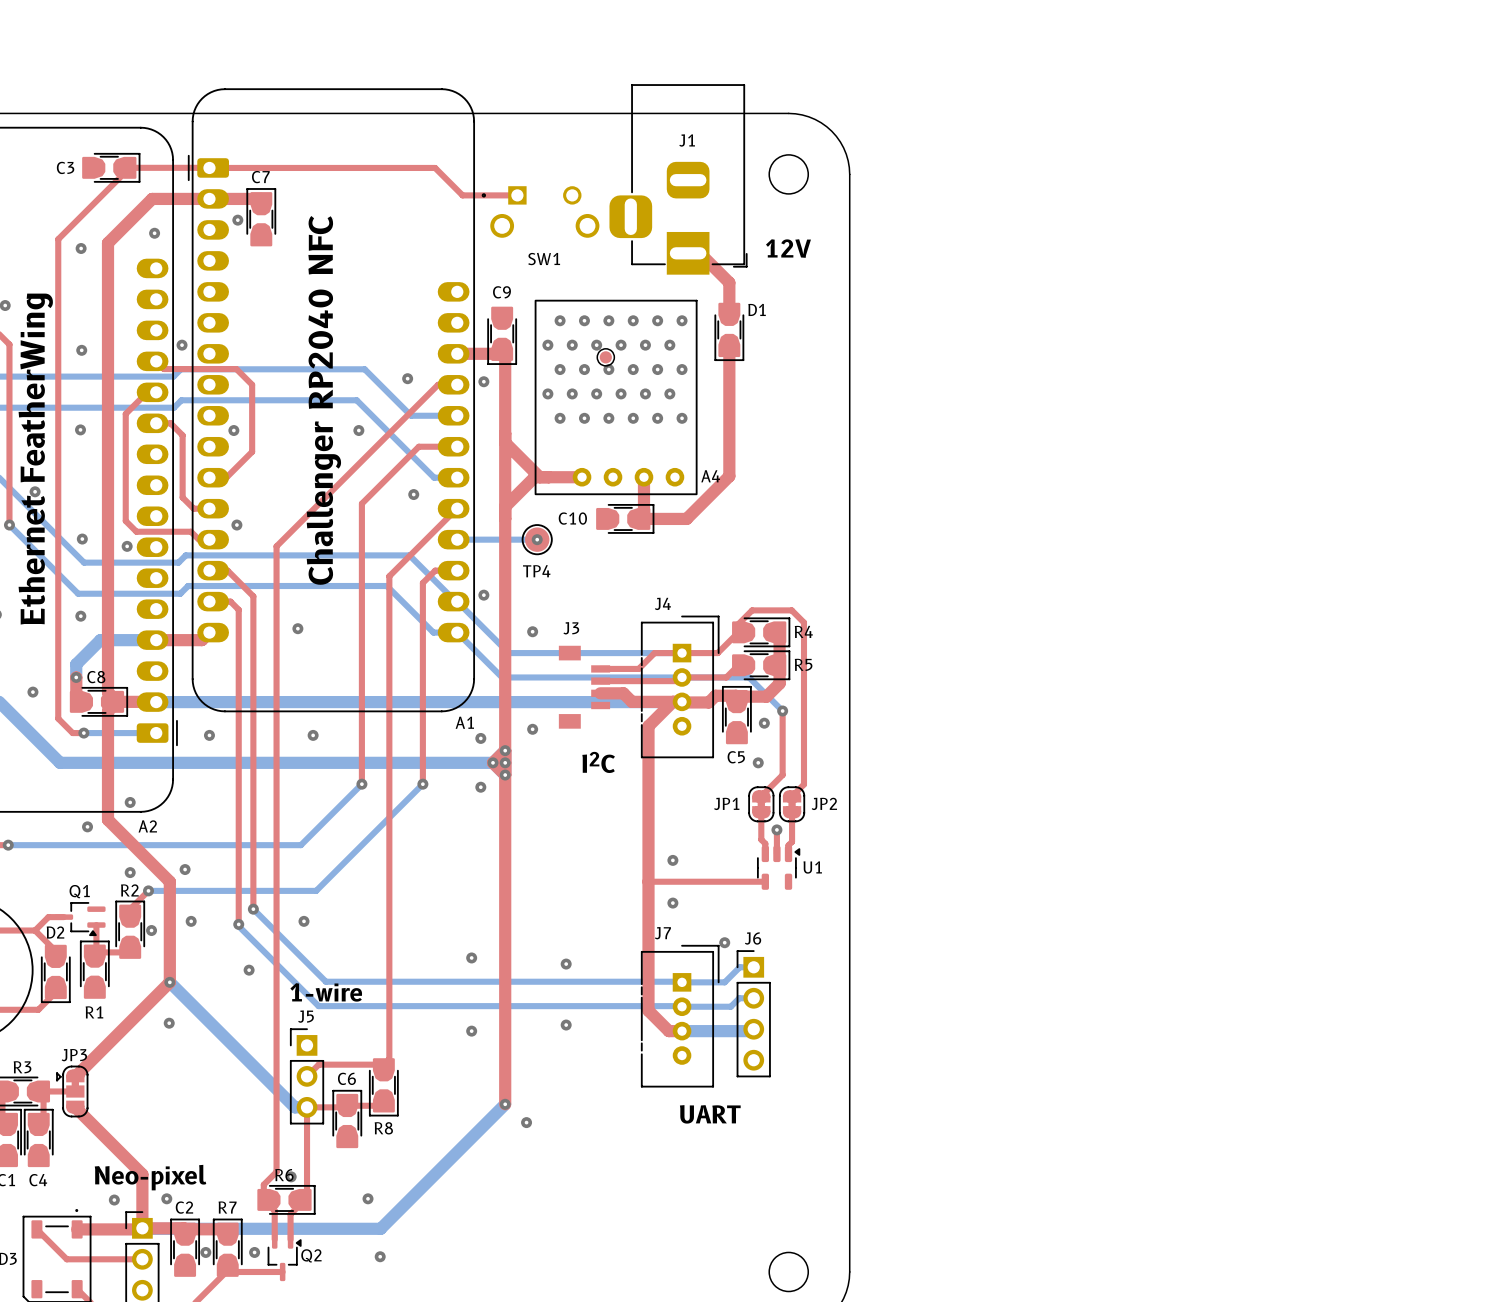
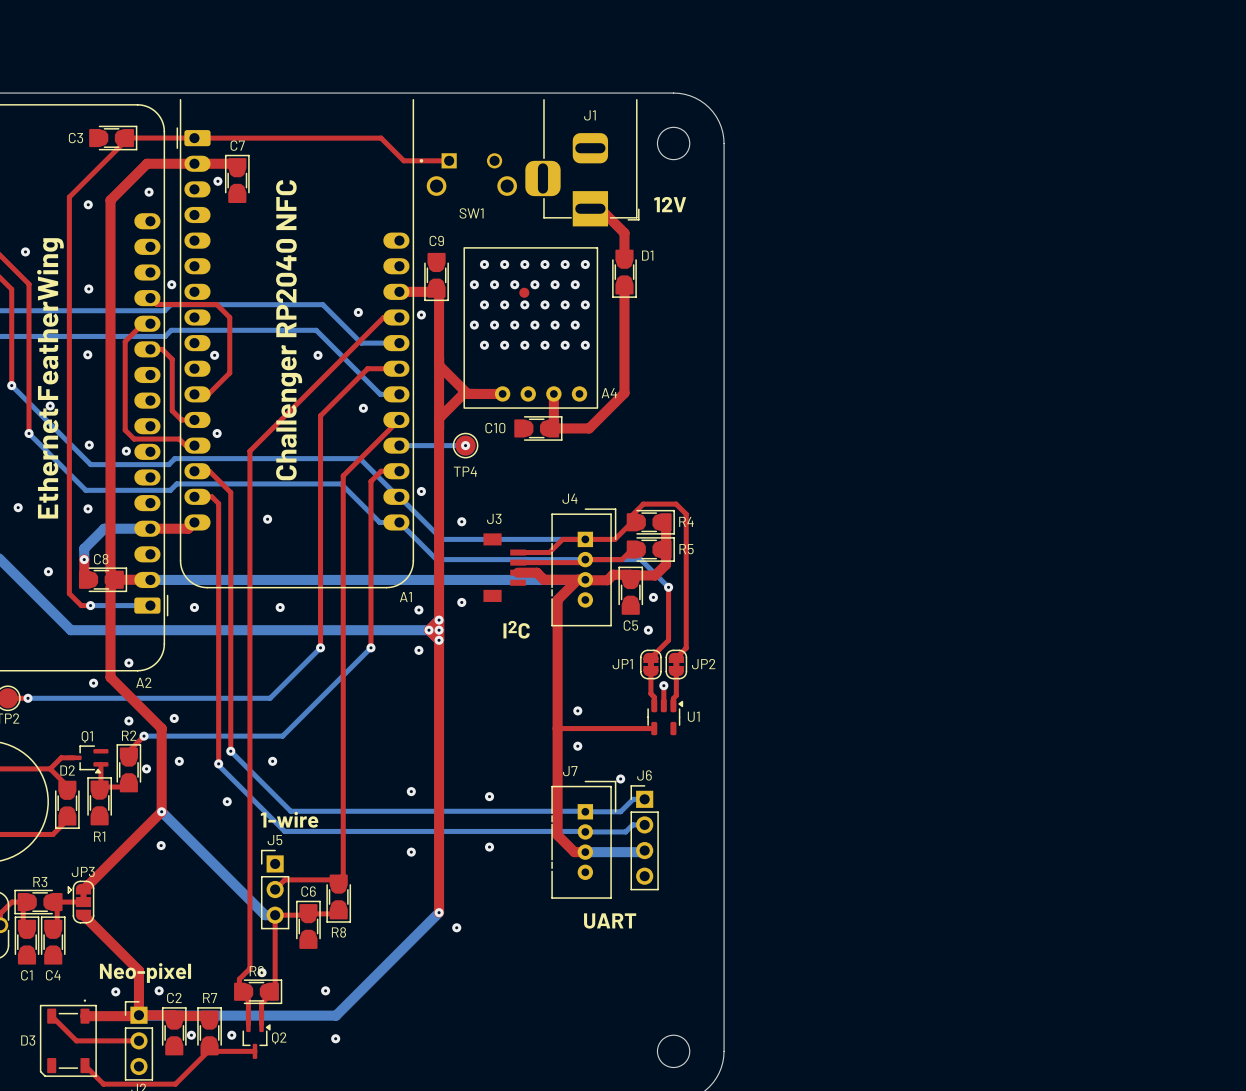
J1 footprint: [609, 84, 748, 275] -> [525, 99, 640, 227]
A1 footprint: [187, 88, 476, 713] -> [176, 98, 415, 589]
part footprint: [596, 348, 616, 367] -> [519, 287, 530, 298]

